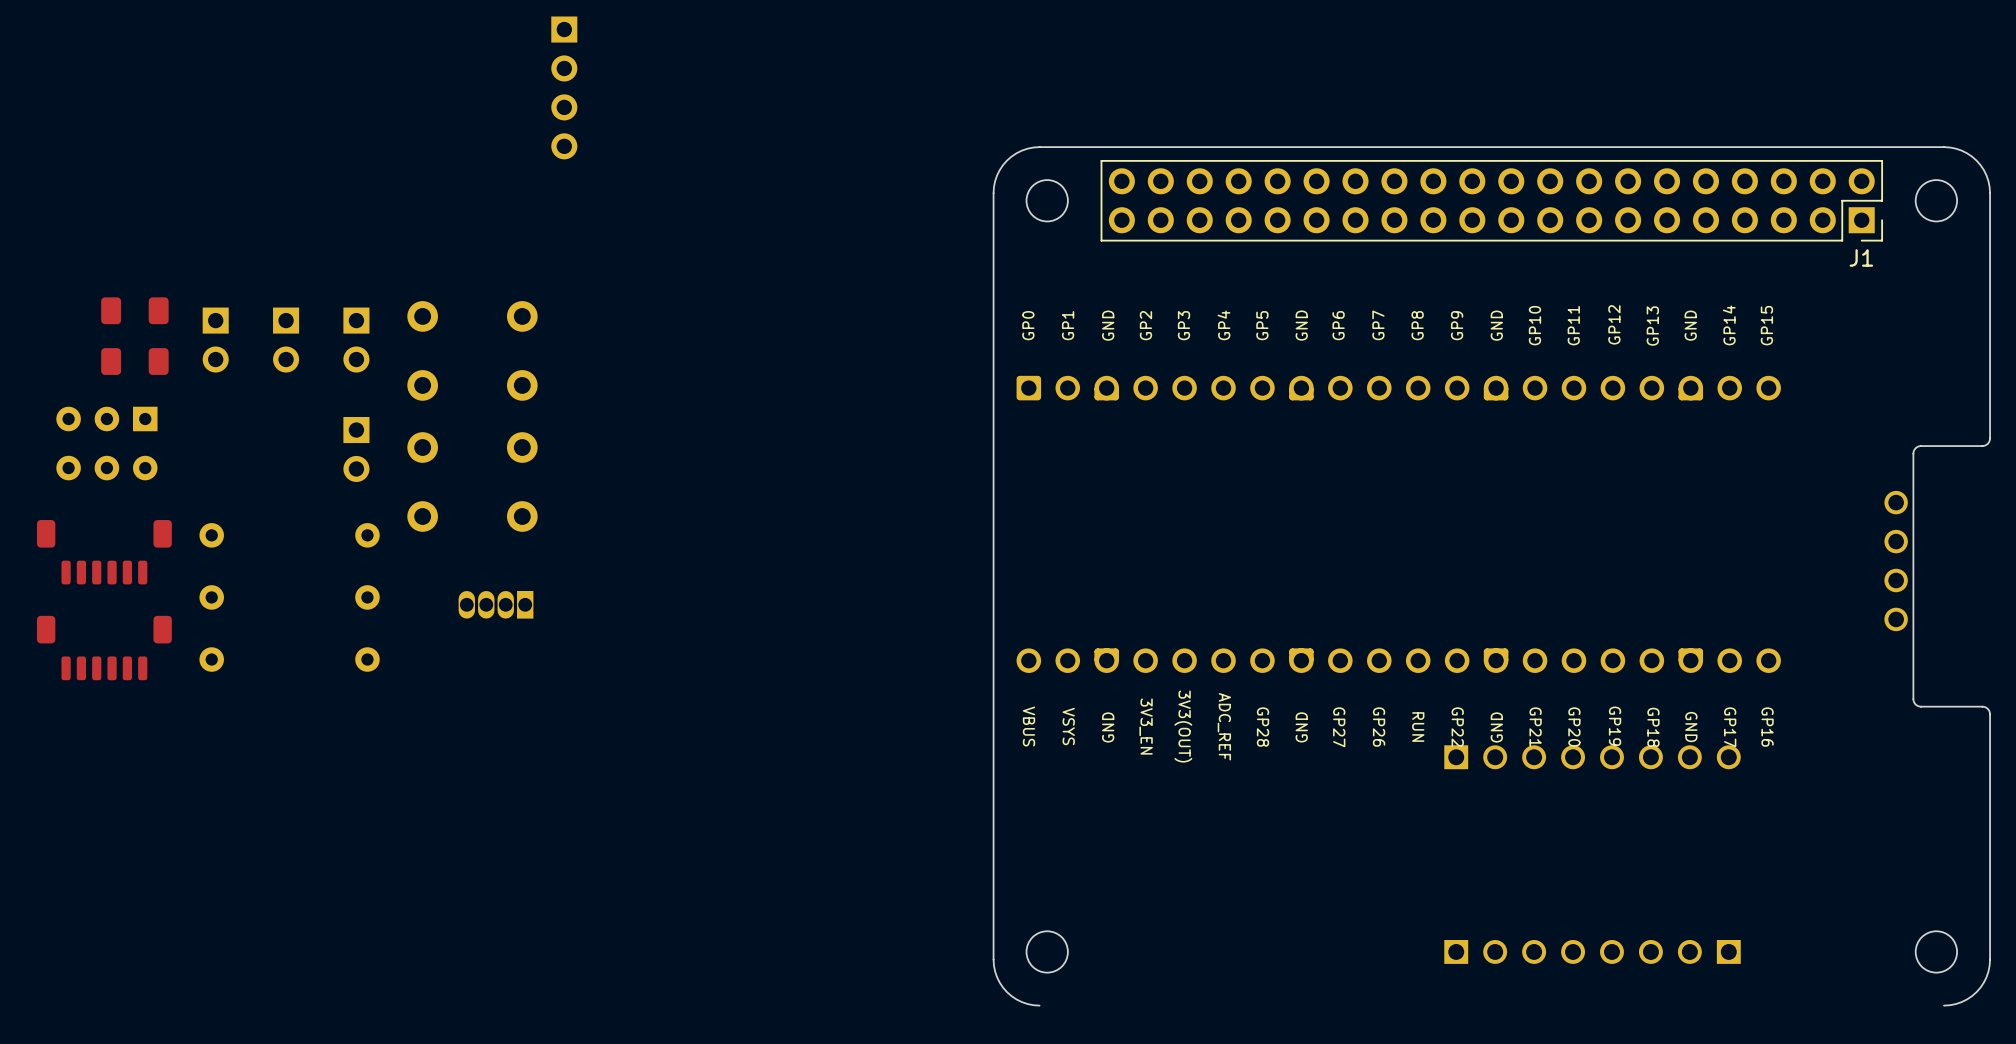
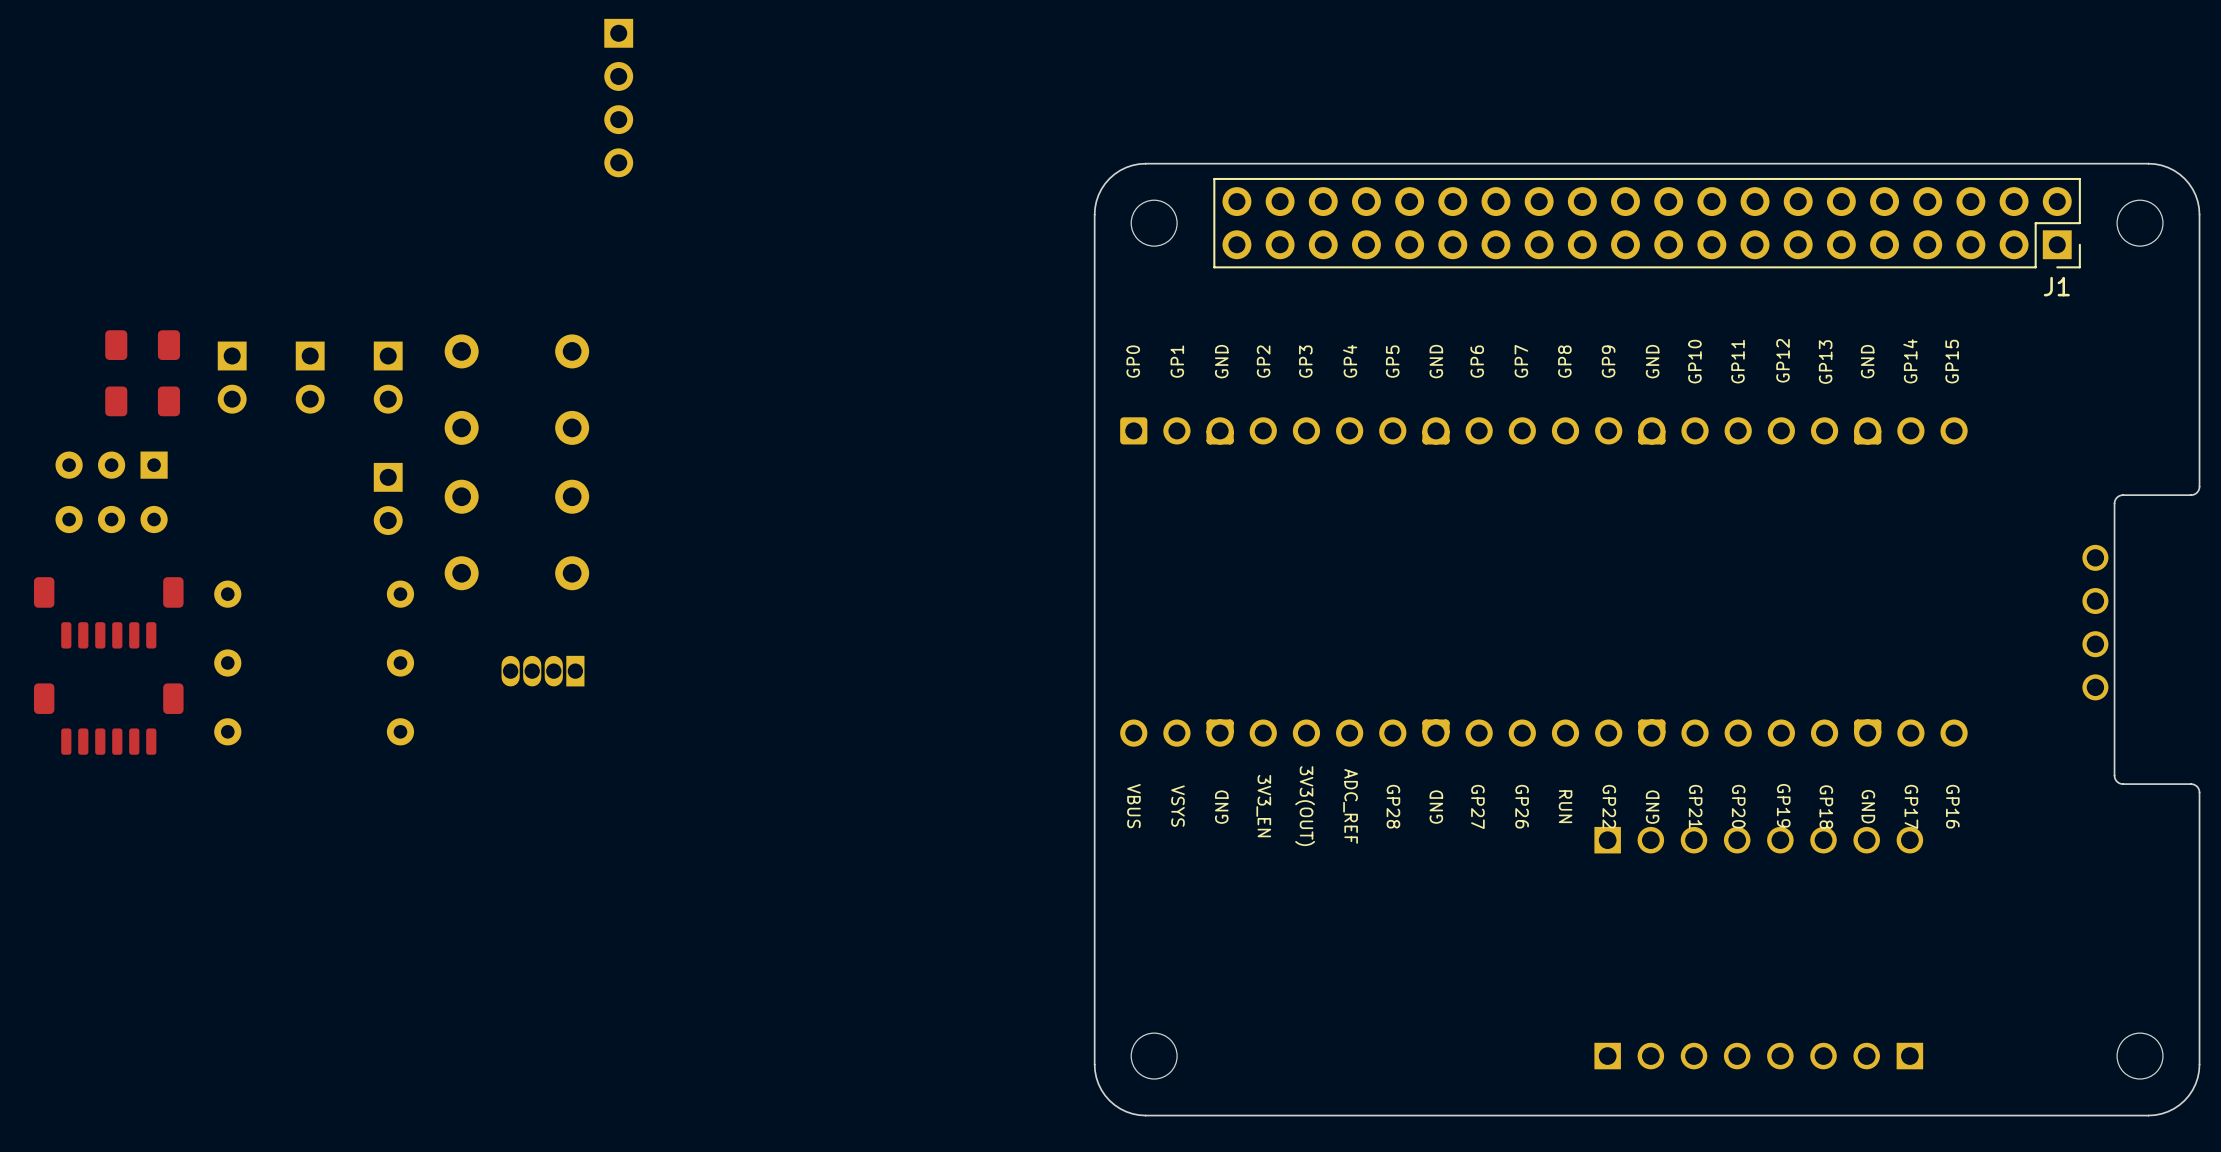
board edge: none -> (2148, 1115) (1145, 1115)

